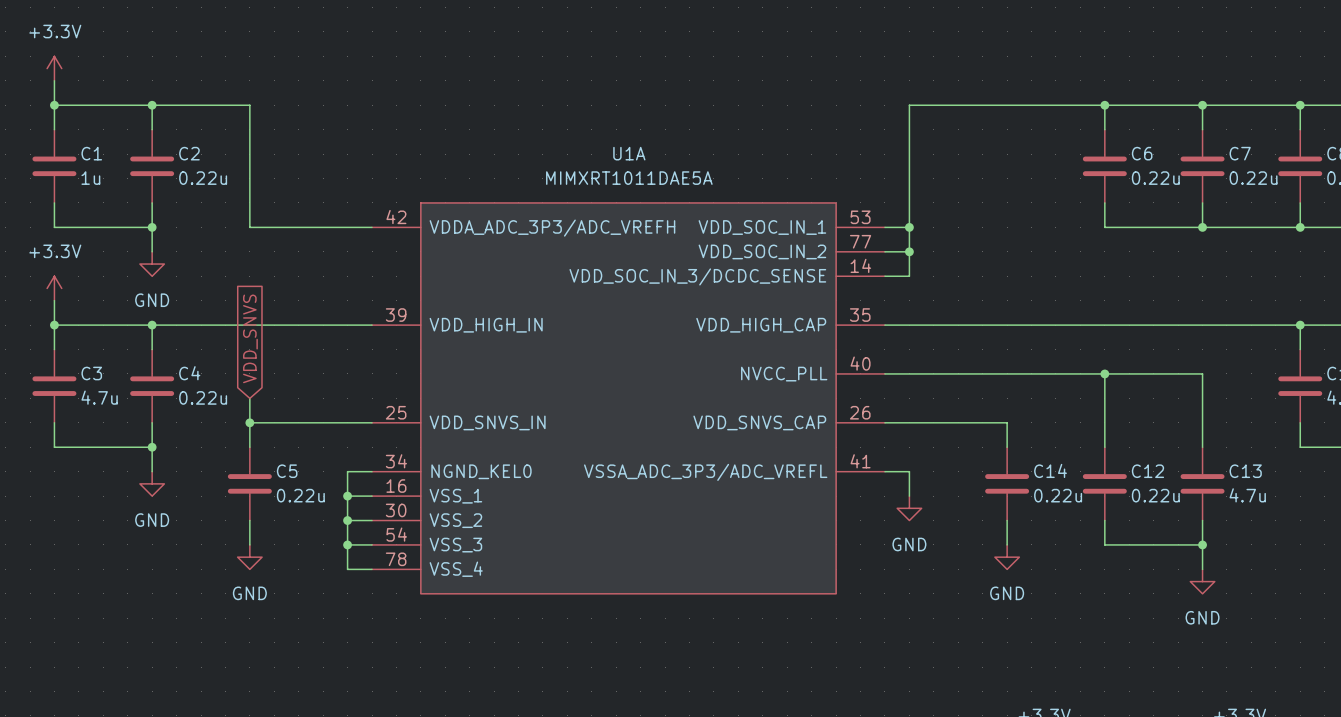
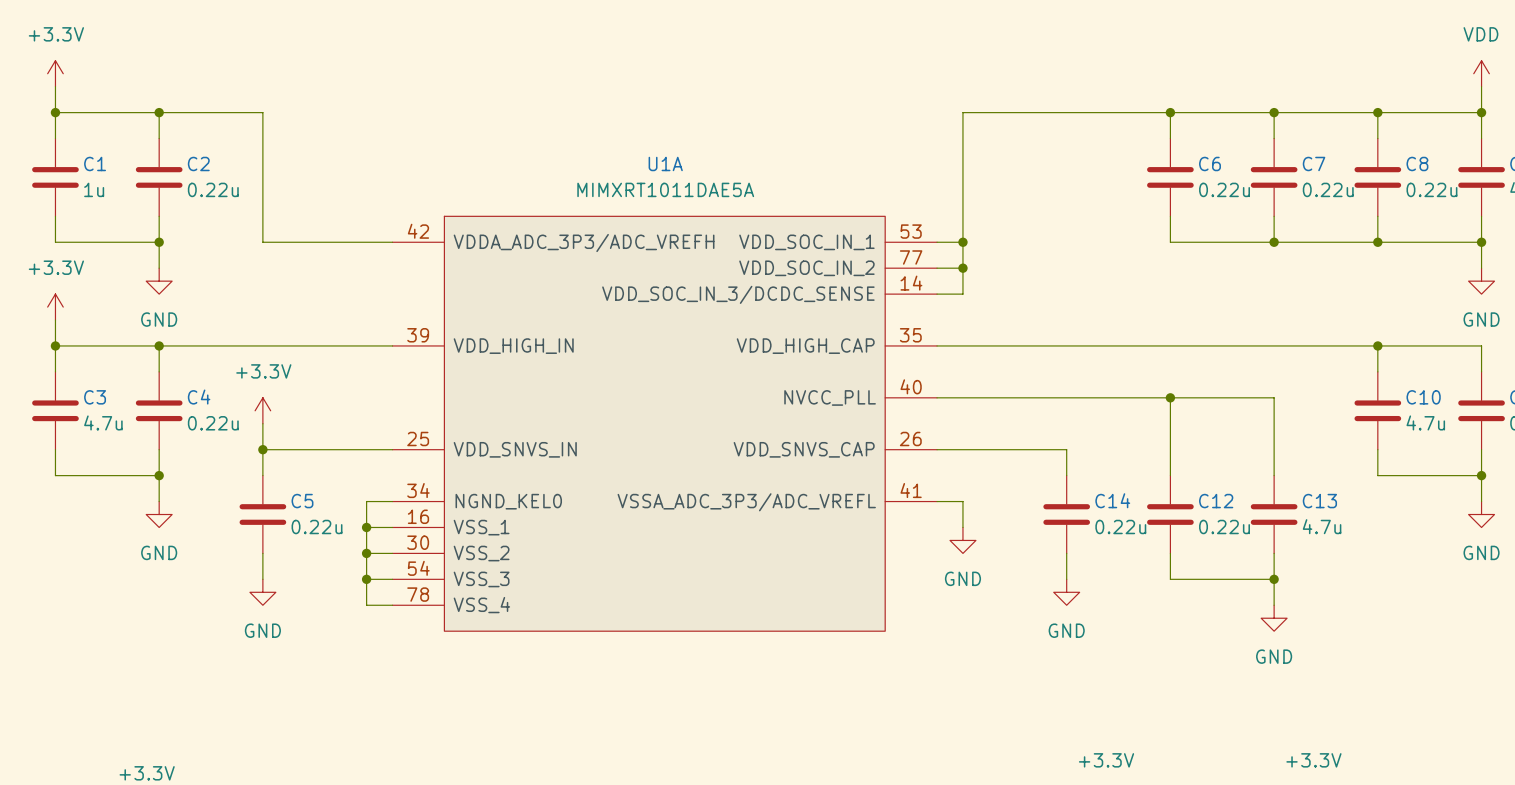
global label: VDD_SNVS (250, 338) -> none
power symbol: none -> +3.3V (262, 410)

